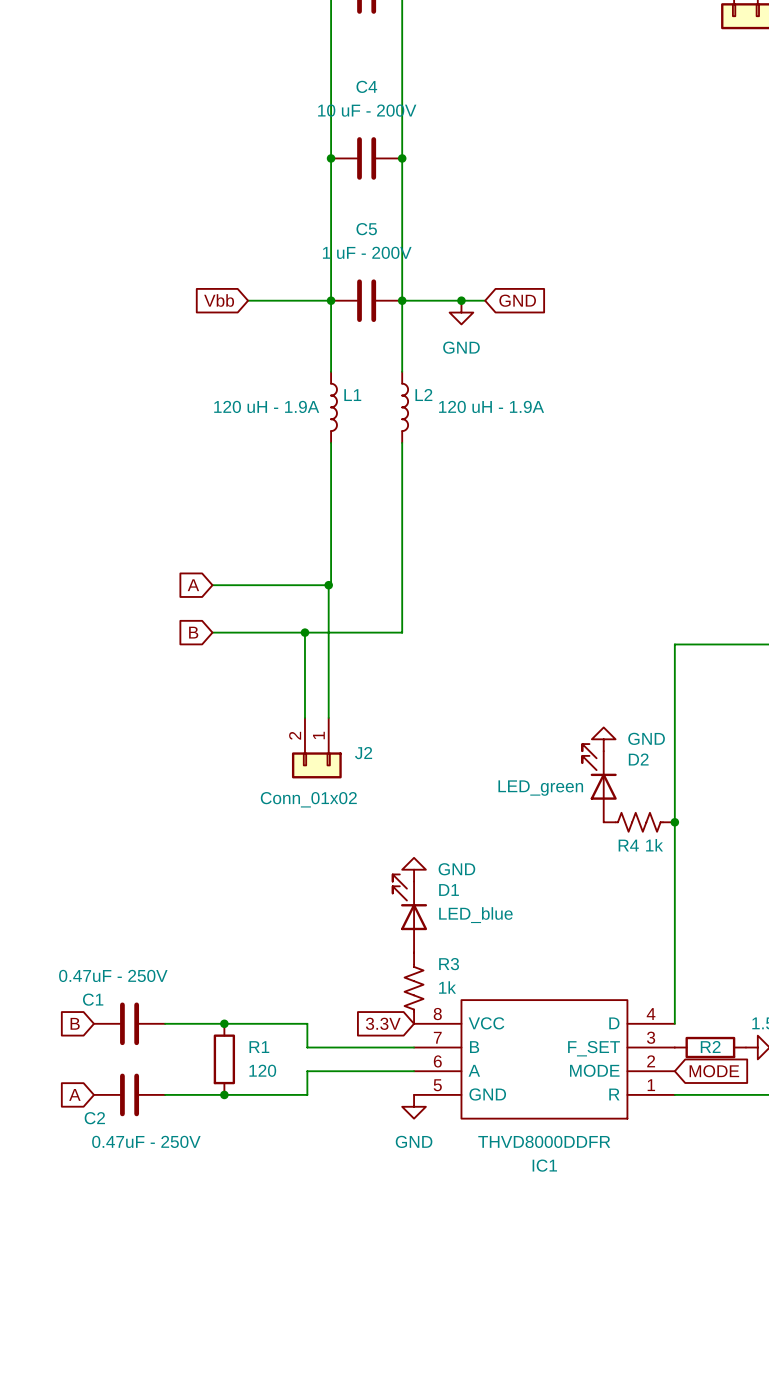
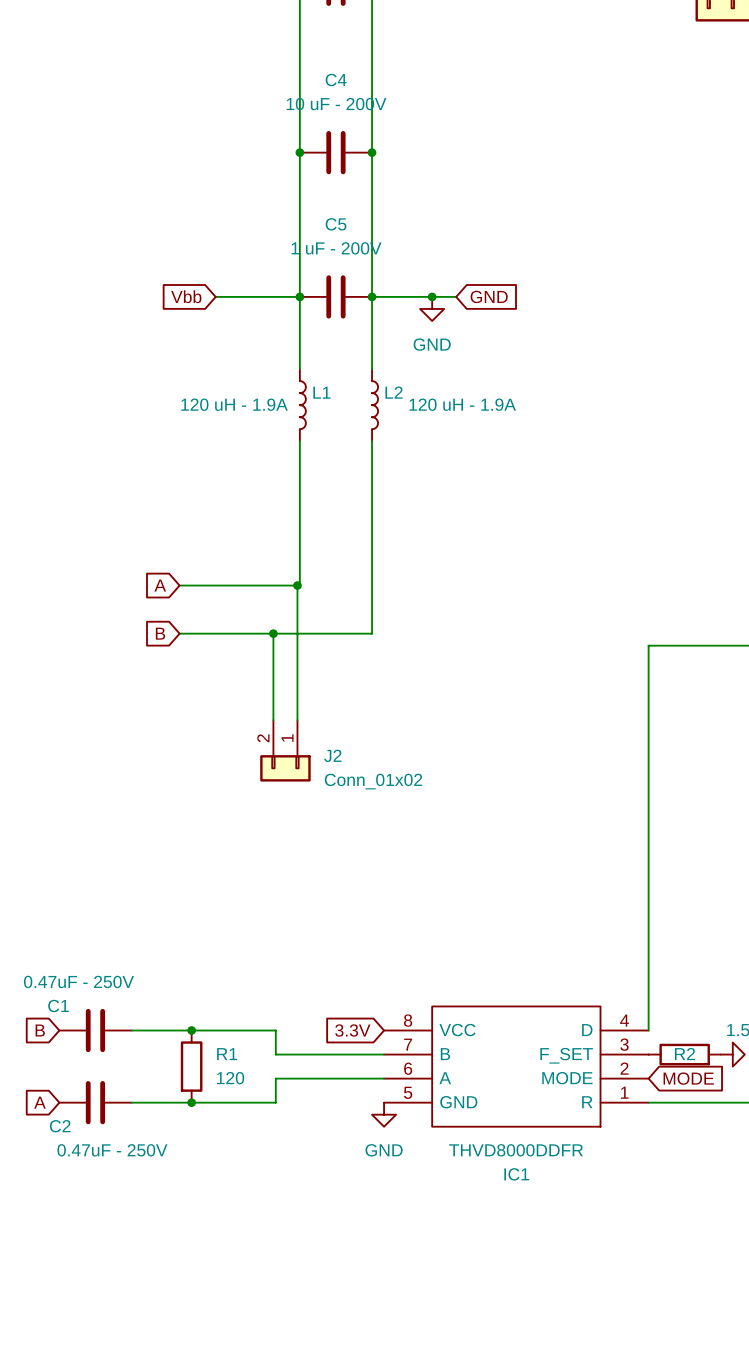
power symbol: GND (603, 739) -> none
D2: LED_green (599, 783) -> none
J2 value position: Conn_01x02 (308, 799) -> Conn_01x02 (373, 781)
R4: 1k (639, 822) -> none
junction: (674, 822) -> none
power symbol: GND (414, 869) -> none
D1: LED_blue (409, 913) -> none
R3: 1k (414, 988) -> none

